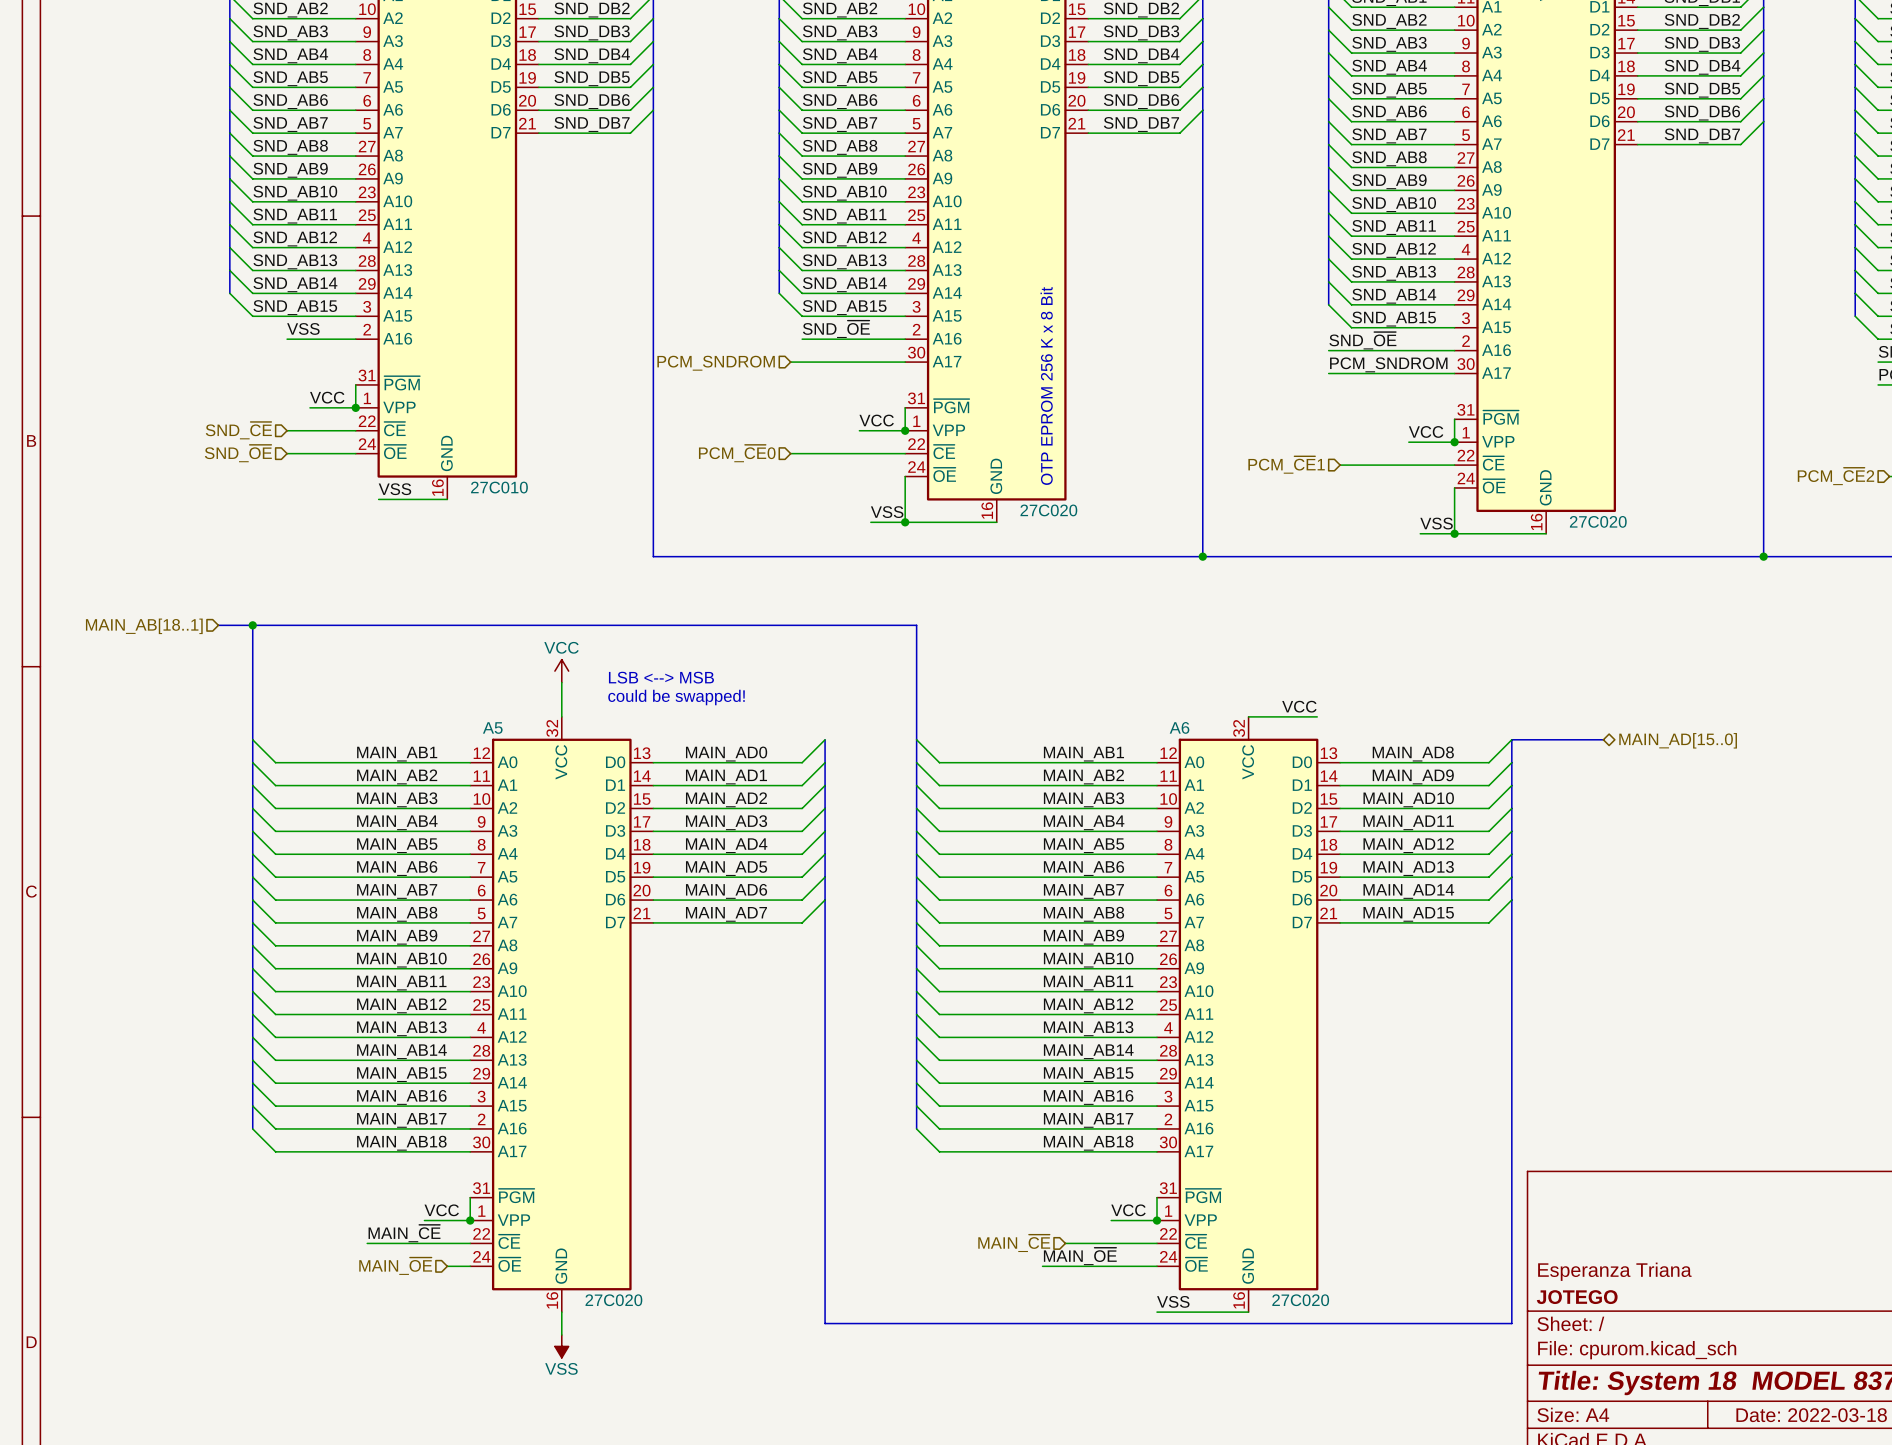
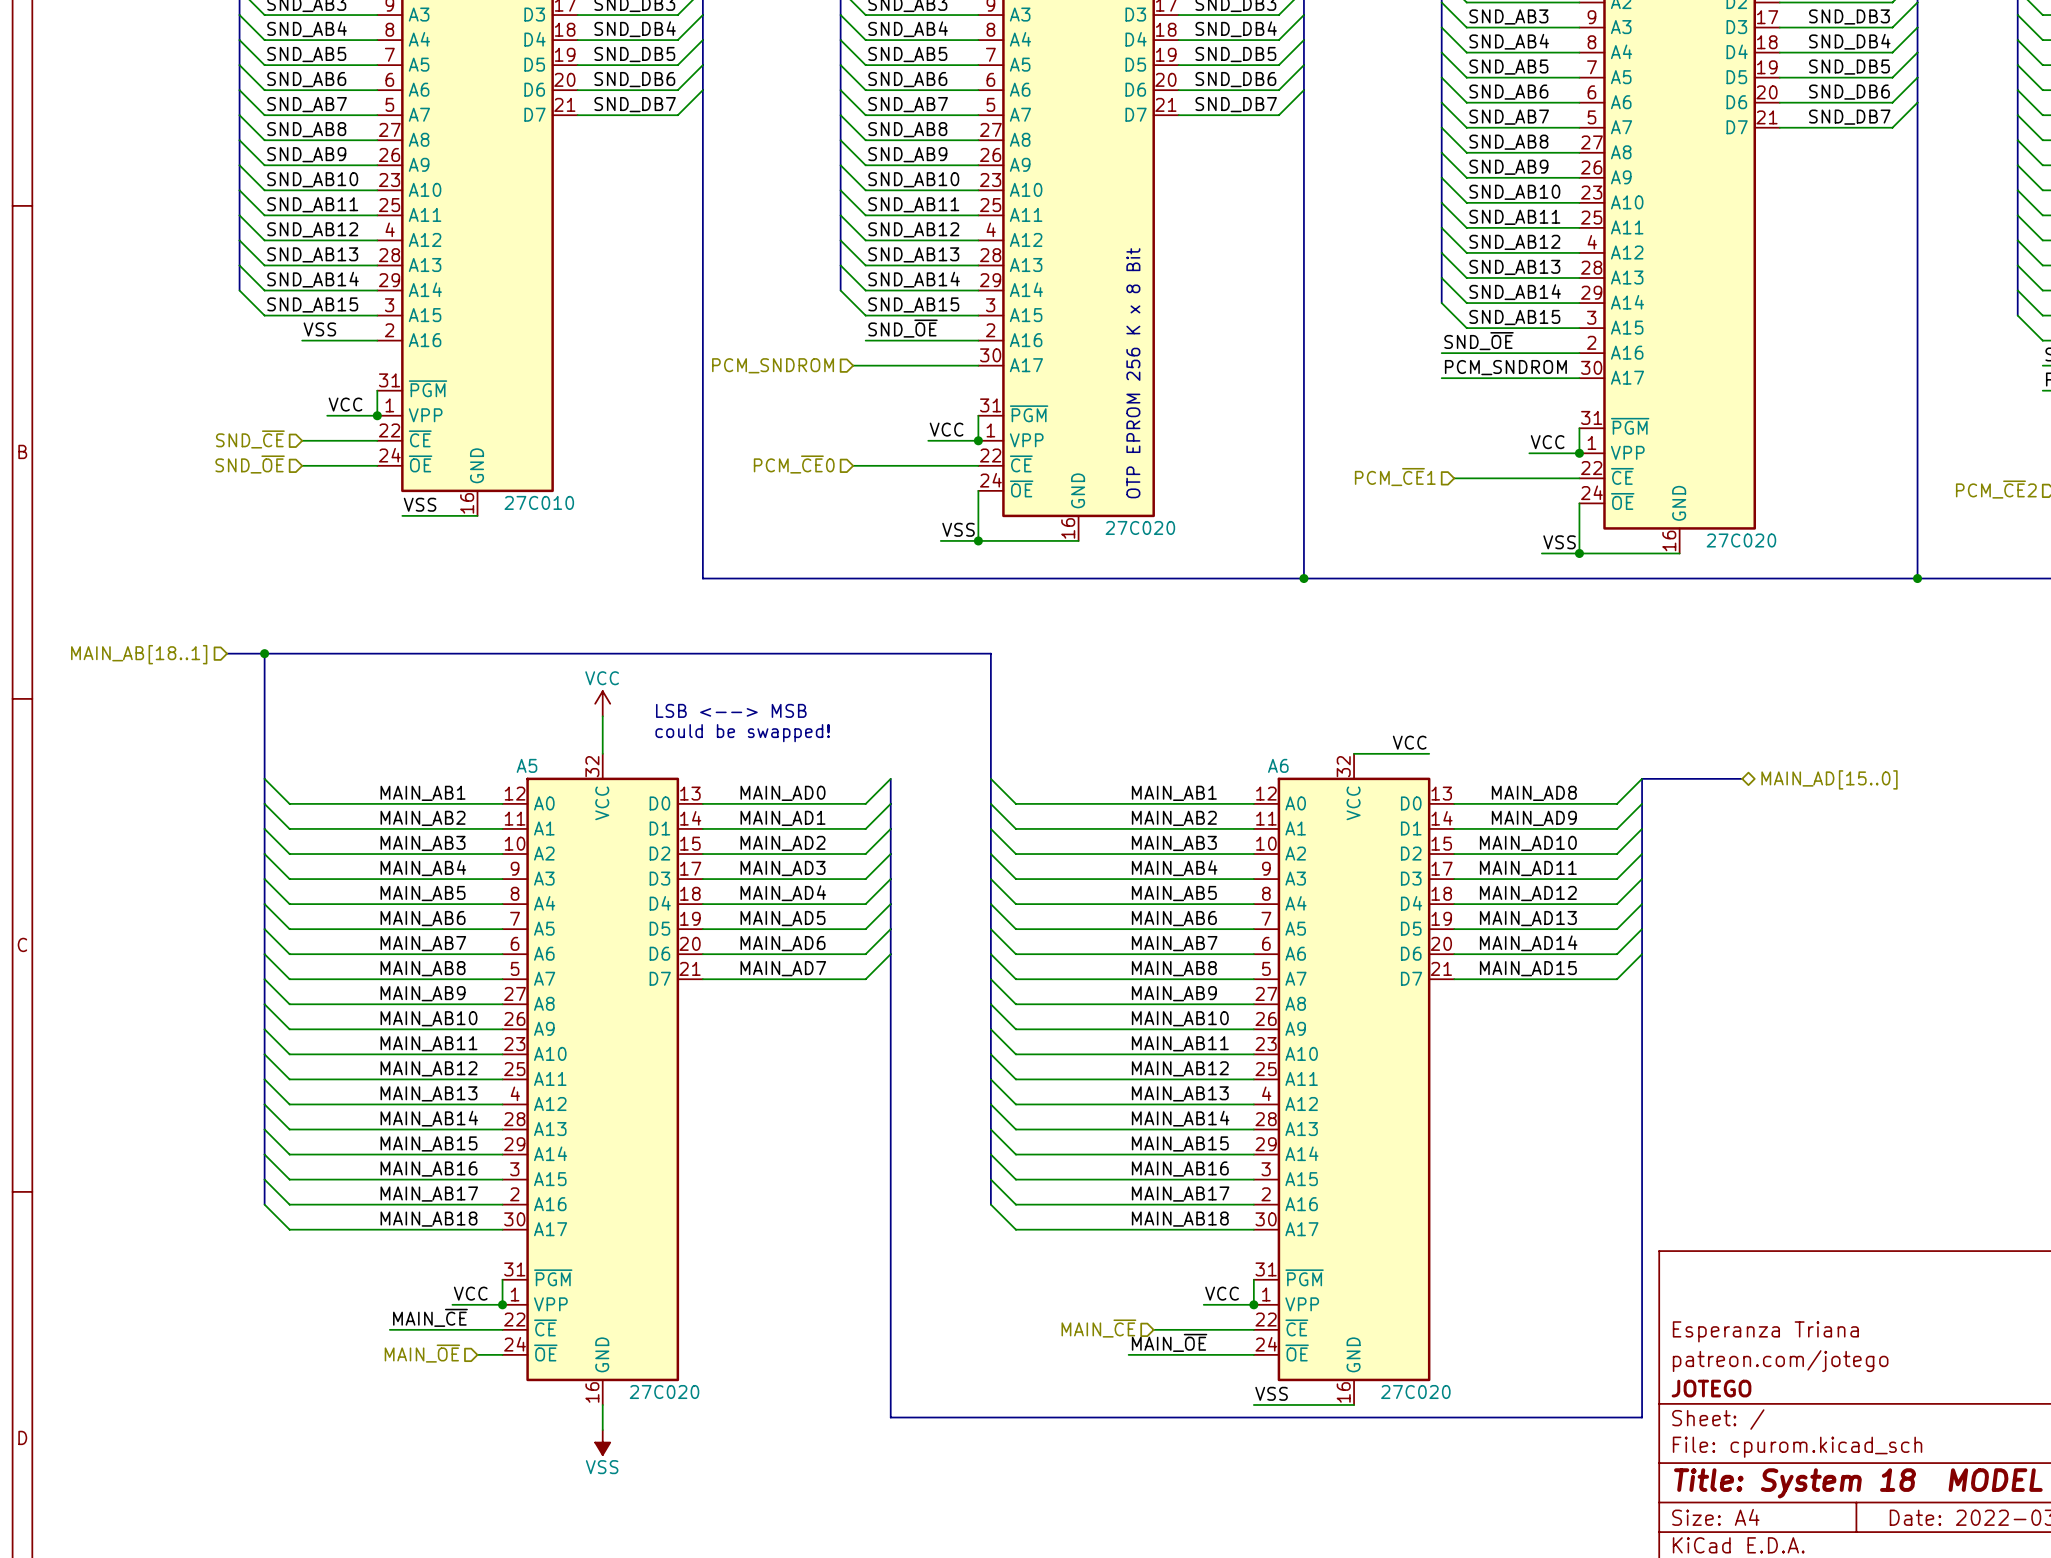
title block: none -> Esperanza Triana (1765, 1331)
title block: Esperanza Triana (1614, 1271) -> patreon.com/jotego (1780, 1361)

